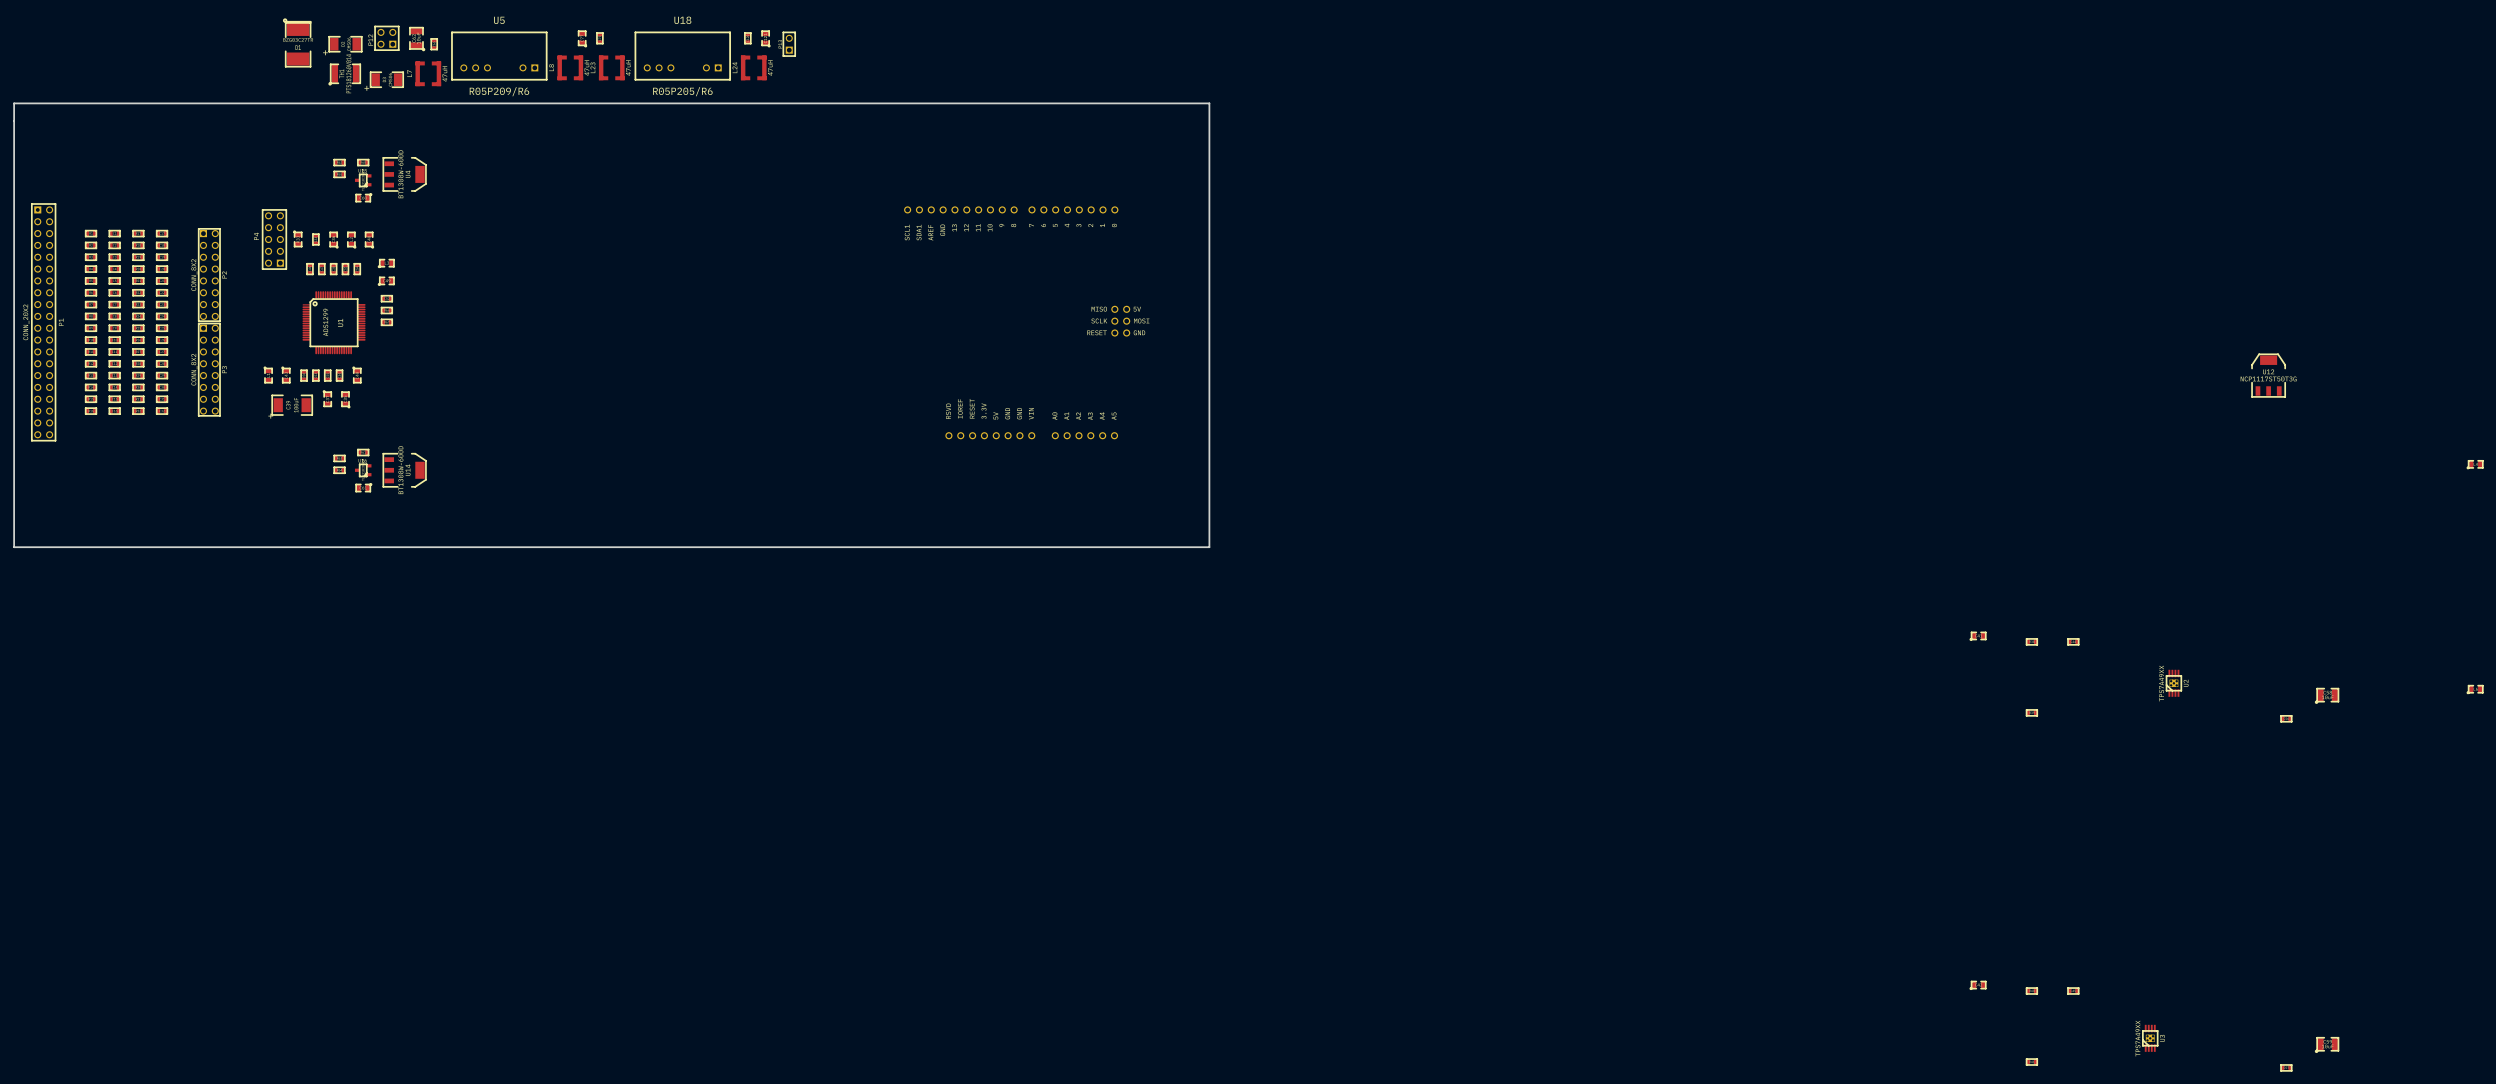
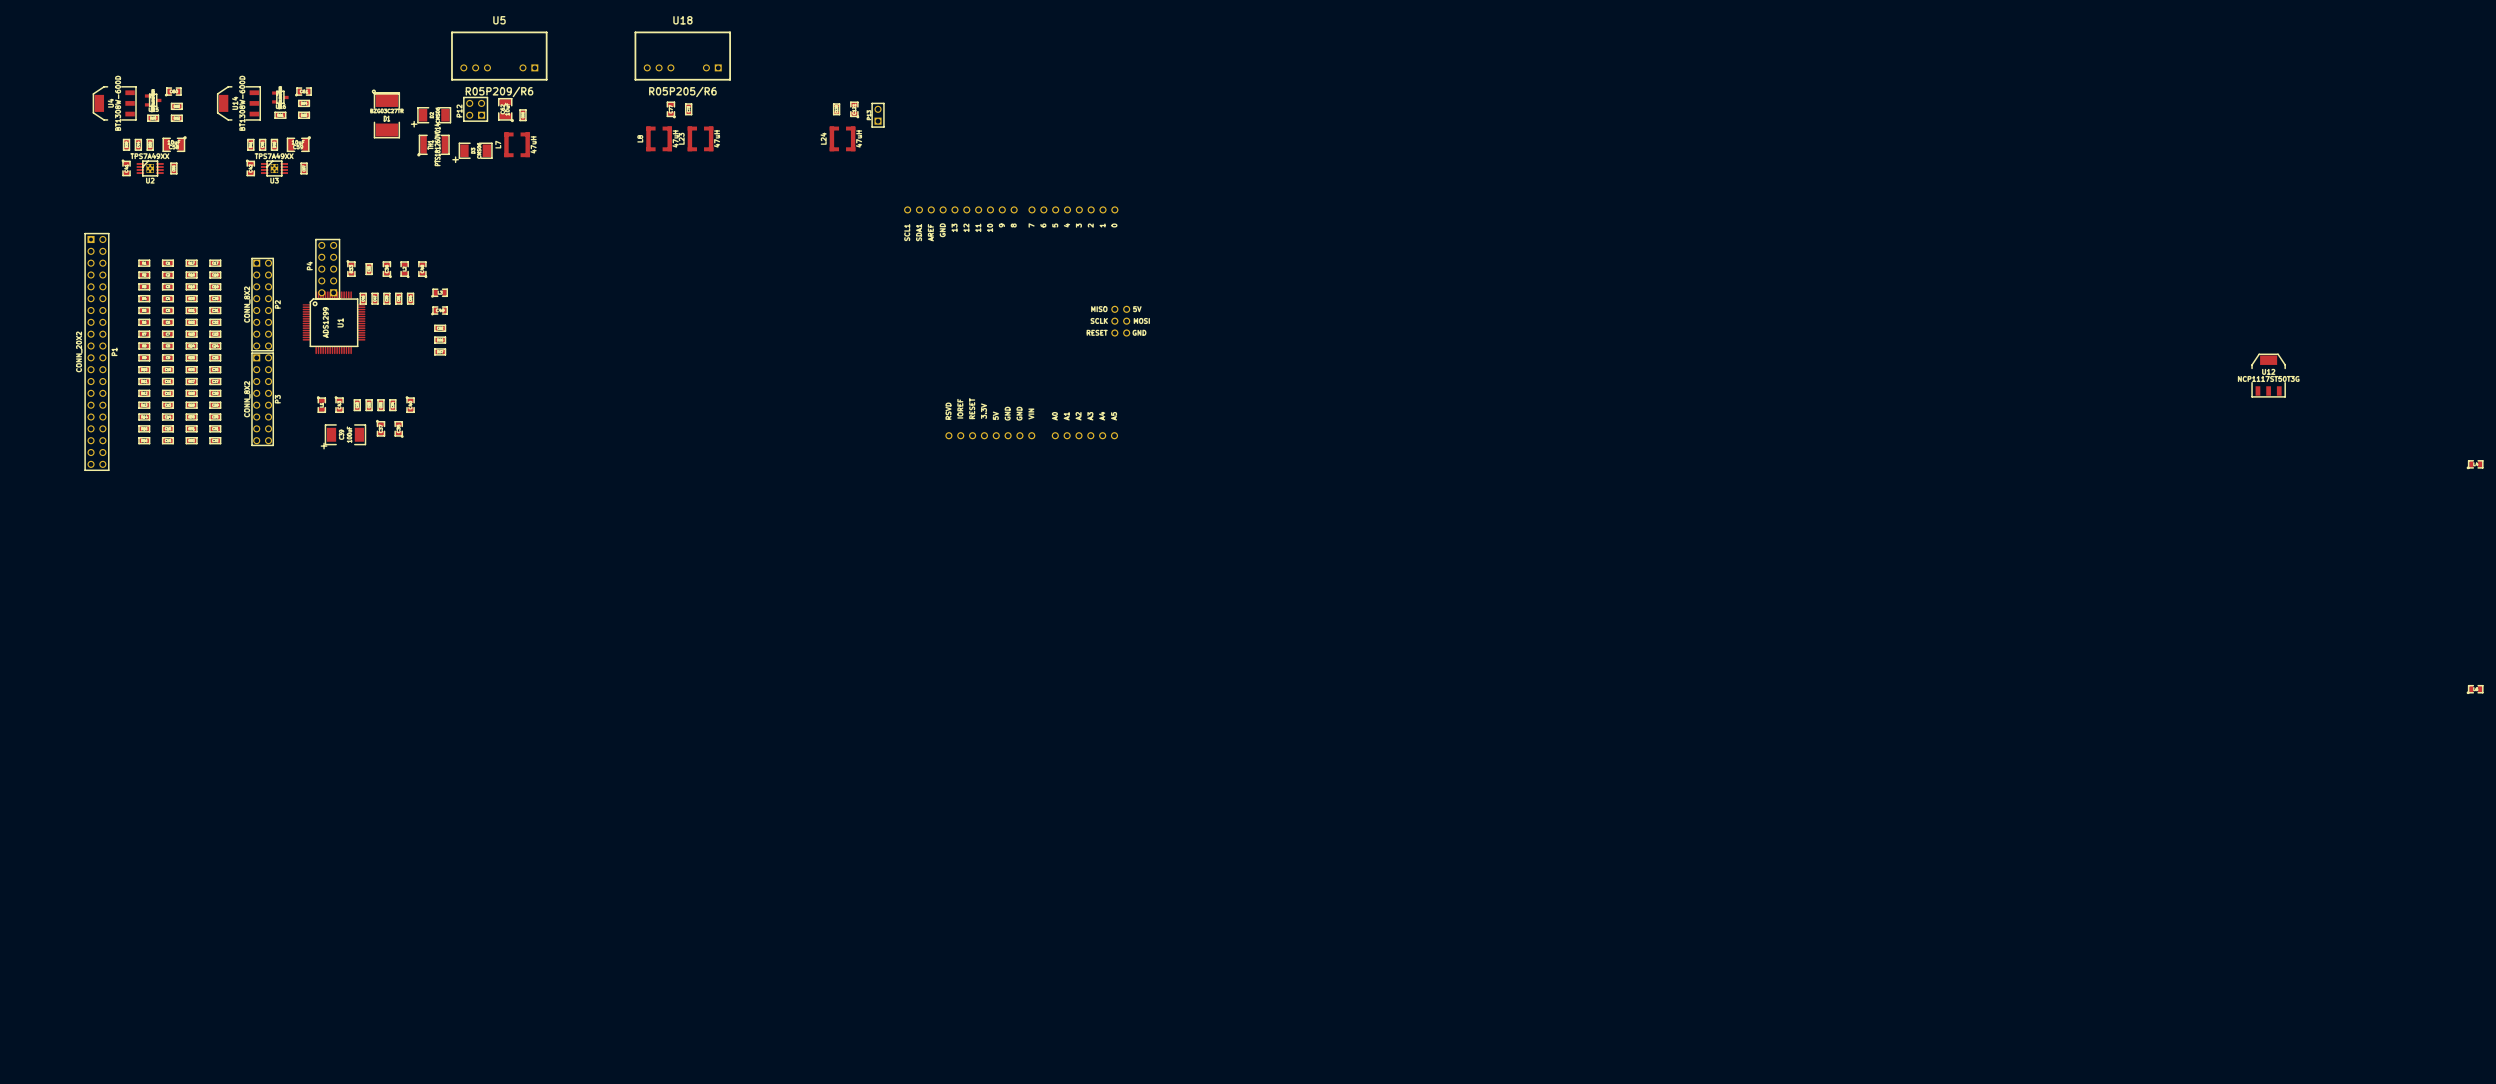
part position: (386, 38) -> (475, 109)
part position: (582, 38) -> (671, 109)
part position: (599, 38) -> (688, 109)
part position: (747, 38) -> (836, 109)
part position: (765, 38) -> (854, 109)
part position: (417, 39) -> (505, 110)
part position: (297, 42) -> (385, 113)
part position: (345, 44) -> (434, 115)
part position: (434, 44) -> (522, 115)
part position: (789, 44) -> (878, 115)
part position: (570, 67) -> (659, 138)
part position: (611, 67) -> (700, 138)
part position: (753, 67) -> (842, 138)
part position: (428, 73) -> (517, 144)
part position: (344, 74) -> (433, 145)
part position: (386, 79) -> (475, 150)
board edge: (14, 103) (14, 547) (1209, 547) (1209, 103) (14, 103) -> none
part position: (339, 162) -> (176, 118)
part position: (363, 162) -> (153, 118)
part position: (339, 174) -> (176, 106)
part rotation: 0° (404, 174) -> 180° (114, 103)
part position: (404, 174) -> (114, 103)
part rotation: 0° (363, 180) -> 180° (153, 100)
part position: (363, 180) -> (153, 100)
part rotation: 0° (363, 197) -> 180° (173, 91)
part position: (363, 197) -> (173, 91)
part position: (91, 233) -> (144, 263)
part position: (114, 233) -> (167, 263)
part position: (138, 233) -> (191, 263)
part position: (162, 233) -> (215, 263)
part position: (297, 238) -> (351, 268)
part position: (274, 239) -> (327, 269)
part position: (315, 239) -> (369, 269)
part position: (333, 240) -> (387, 269)
part position: (351, 240) -> (404, 269)
part position: (369, 240) -> (422, 269)
part position: (91, 245) -> (144, 275)
part position: (114, 245) -> (167, 275)
part position: (138, 245) -> (191, 275)
part position: (162, 245) -> (215, 275)
part position: (91, 257) -> (144, 286)
part position: (114, 257) -> (167, 286)
part position: (138, 257) -> (191, 286)
part position: (162, 257) -> (215, 286)
part position: (386, 263) -> (439, 293)
part position: (91, 269) -> (144, 298)
part position: (114, 269) -> (167, 298)
part position: (138, 269) -> (191, 298)
part position: (162, 269) -> (215, 298)
part position: (309, 269) -> (363, 298)
part position: (321, 269) -> (375, 298)
part position: (333, 269) -> (386, 298)
part position: (345, 269) -> (398, 298)
part position: (357, 269) -> (410, 298)
part position: (209, 275) -> (262, 304)
part position: (91, 280) -> (144, 310)
part position: (114, 280) -> (167, 310)
part position: (138, 280) -> (191, 310)
part position: (162, 280) -> (215, 310)
part position: (386, 281) -> (439, 310)
part position: (91, 292) -> (144, 322)
part position: (114, 292) -> (167, 322)
part position: (138, 292) -> (191, 322)
part position: (162, 292) -> (215, 322)
part position: (386, 298) -> (440, 328)
part position: (91, 304) -> (144, 334)
part position: (114, 304) -> (167, 334)
part position: (138, 304) -> (191, 334)
part position: (162, 304) -> (215, 334)
part position: (386, 310) -> (440, 340)
part position: (91, 316) -> (144, 346)
part position: (114, 316) -> (167, 346)
part position: (138, 316) -> (191, 346)
part position: (162, 316) -> (215, 346)
part position: (43, 322) -> (96, 351)
part position: (386, 322) -> (440, 351)
part position: (91, 328) -> (144, 357)
part position: (114, 328) -> (167, 357)
part position: (138, 328) -> (191, 357)
part position: (162, 328) -> (215, 357)
part position: (91, 340) -> (144, 369)
part position: (114, 340) -> (167, 369)
part position: (138, 340) -> (191, 369)
part position: (162, 340) -> (215, 369)
part position: (91, 351) -> (144, 381)
part position: (114, 351) -> (167, 381)
part position: (138, 351) -> (191, 381)
part position: (162, 351) -> (215, 381)
part position: (91, 363) -> (144, 393)
part position: (114, 363) -> (167, 393)
part position: (138, 363) -> (191, 393)
part position: (162, 363) -> (215, 393)
part position: (209, 369) -> (262, 399)
part position: (91, 375) -> (144, 405)
part position: (114, 375) -> (167, 405)
part position: (138, 375) -> (191, 405)
part position: (162, 375) -> (215, 405)
part position: (268, 375) -> (321, 404)
part position: (286, 375) -> (339, 404)
part position: (304, 375) -> (357, 405)
part position: (315, 375) -> (369, 405)
part position: (327, 375) -> (380, 405)
part position: (339, 375) -> (392, 405)
part position: (357, 375) -> (410, 404)
part position: (91, 387) -> (144, 417)
part position: (114, 387) -> (167, 417)
part position: (138, 387) -> (191, 417)
part position: (162, 387) -> (215, 417)
part position: (327, 398) -> (380, 428)
part position: (91, 399) -> (144, 428)
part position: (114, 399) -> (167, 428)
part position: (138, 399) -> (191, 428)
part position: (162, 399) -> (215, 428)
part position: (345, 399) -> (399, 429)
part position: (292, 405) -> (345, 434)
part position: (91, 411) -> (144, 440)
part position: (114, 411) -> (167, 440)
part position: (138, 411) -> (191, 440)
part position: (162, 411) -> (215, 440)
part position: (363, 452) -> (280, 115)
part position: (339, 458) -> (304, 115)
part position: (339, 470) -> (304, 103)
part rotation: 0° (363, 470) -> 180° (280, 97)
part position: (363, 470) -> (280, 97)
part rotation: 0° (404, 470) -> 180° (238, 103)
part position: (404, 470) -> (238, 103)
part rotation: 0° (363, 487) -> 180° (303, 91)
part position: (363, 487) -> (303, 91)
part rotation: 0° (1978, 636) -> 90° clockwise (126, 167)
part position: (1978, 636) -> (126, 167)
part rotation: 0° (2031, 641) -> 90° clockwise (150, 144)
part position: (2031, 641) -> (150, 144)
part rotation: 0° (2073, 641) -> 90° clockwise (138, 144)
part position: (2073, 641) -> (138, 144)
part rotation: 0° (2173, 683) -> 90° clockwise (150, 168)
part position: (2173, 683) -> (150, 168)
part rotation: 0° (2327, 695) -> 180° (174, 144)
part position: (2327, 695) -> (174, 144)
part rotation: 0° (2031, 712) -> 90° clockwise (126, 144)
part position: (2031, 712) -> (126, 144)
part rotation: 0° (2286, 718) -> 90° clockwise (173, 168)
part position: (2286, 718) -> (173, 168)
part rotation: 0° (1978, 985) -> 90° clockwise (250, 167)
part position: (1978, 985) -> (250, 167)
part rotation: 0° (2031, 991) -> 90° clockwise (274, 144)
part position: (2031, 991) -> (274, 144)
part rotation: 0° (2073, 991) -> 90° clockwise (262, 144)
part position: (2073, 991) -> (262, 144)
part rotation: 0° (2150, 1038) -> 90° clockwise (274, 168)
part position: (2150, 1038) -> (274, 168)
part rotation: 0° (2327, 1044) -> 180° (298, 144)
part position: (2327, 1044) -> (298, 144)
part rotation: 0° (2031, 1062) -> 90° clockwise (250, 144)
part position: (2031, 1062) -> (250, 144)
part rotation: 0° (2286, 1067) -> 90° clockwise (304, 168)
part position: (2286, 1067) -> (304, 168)

